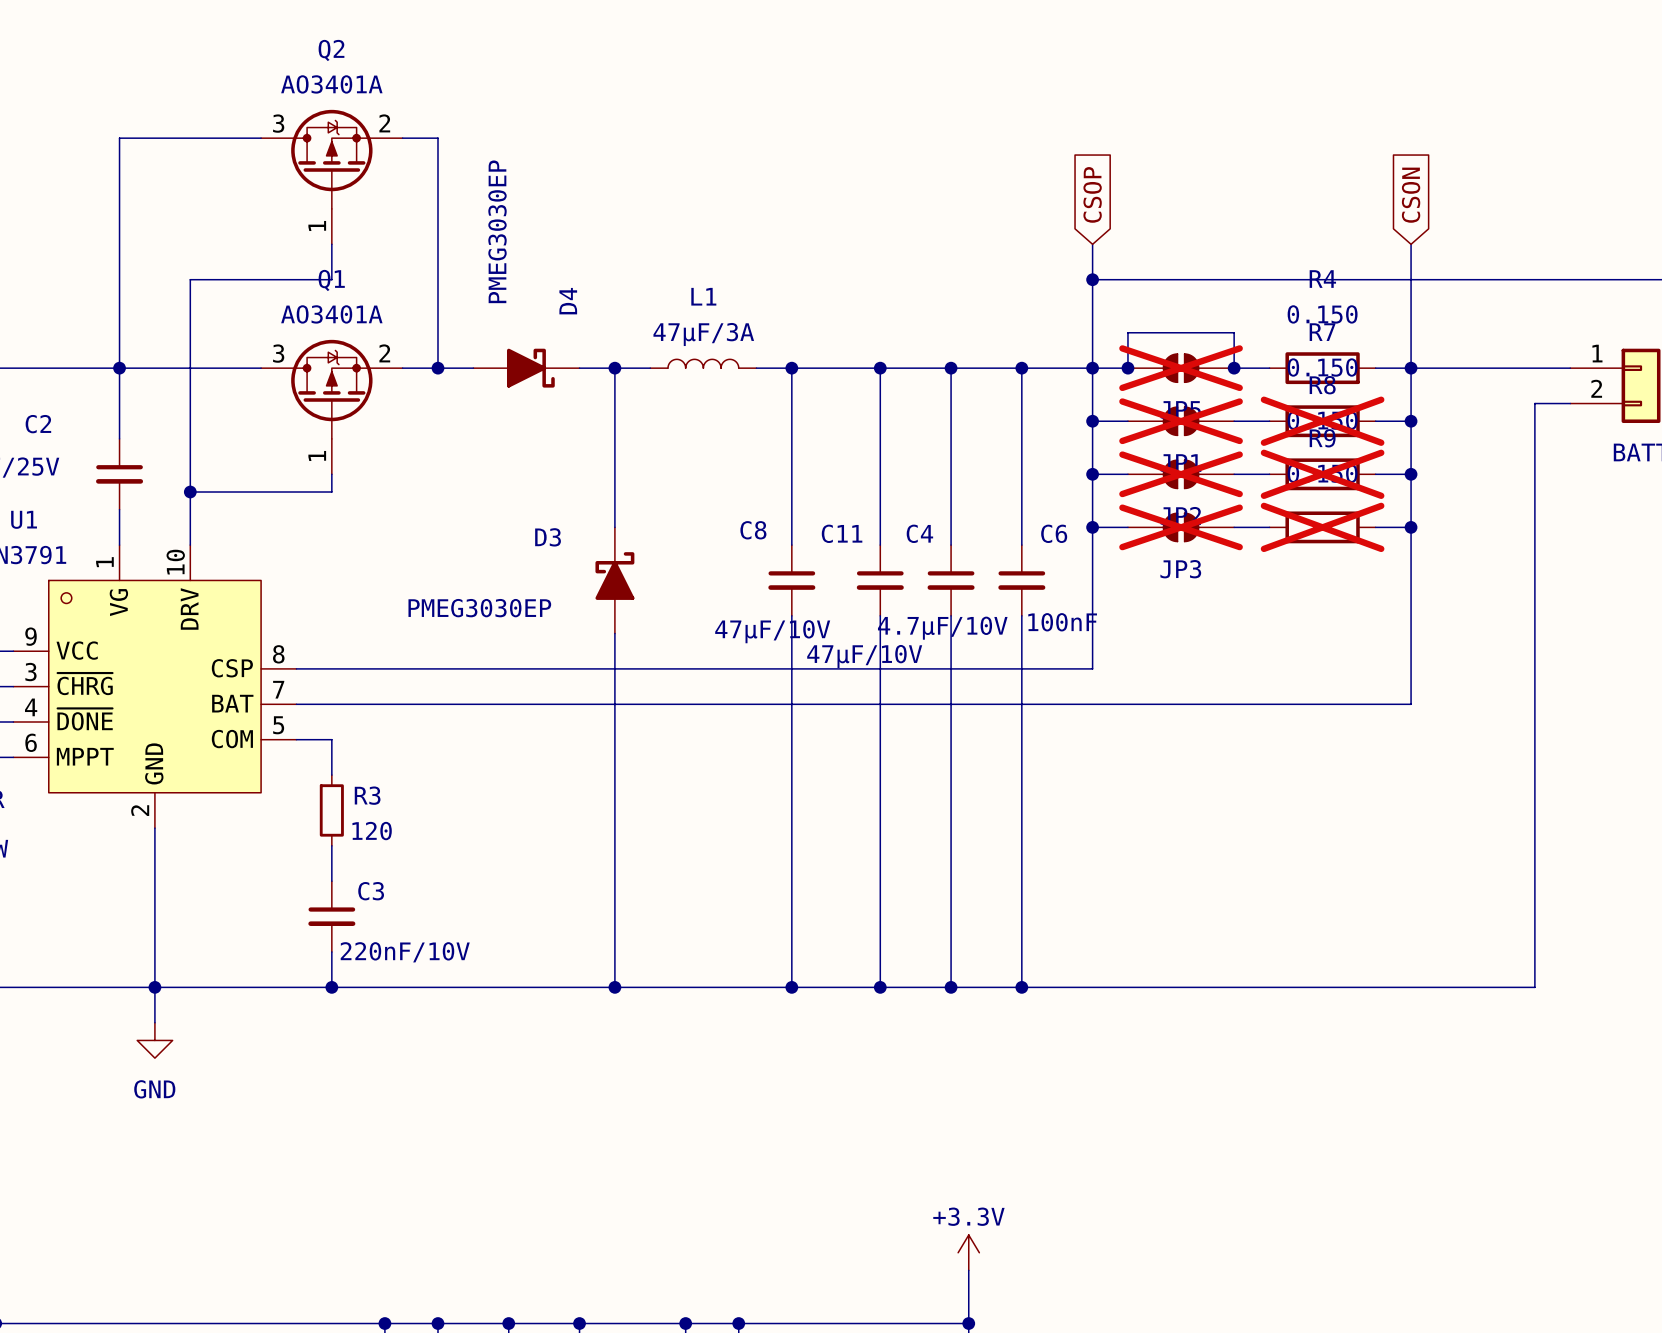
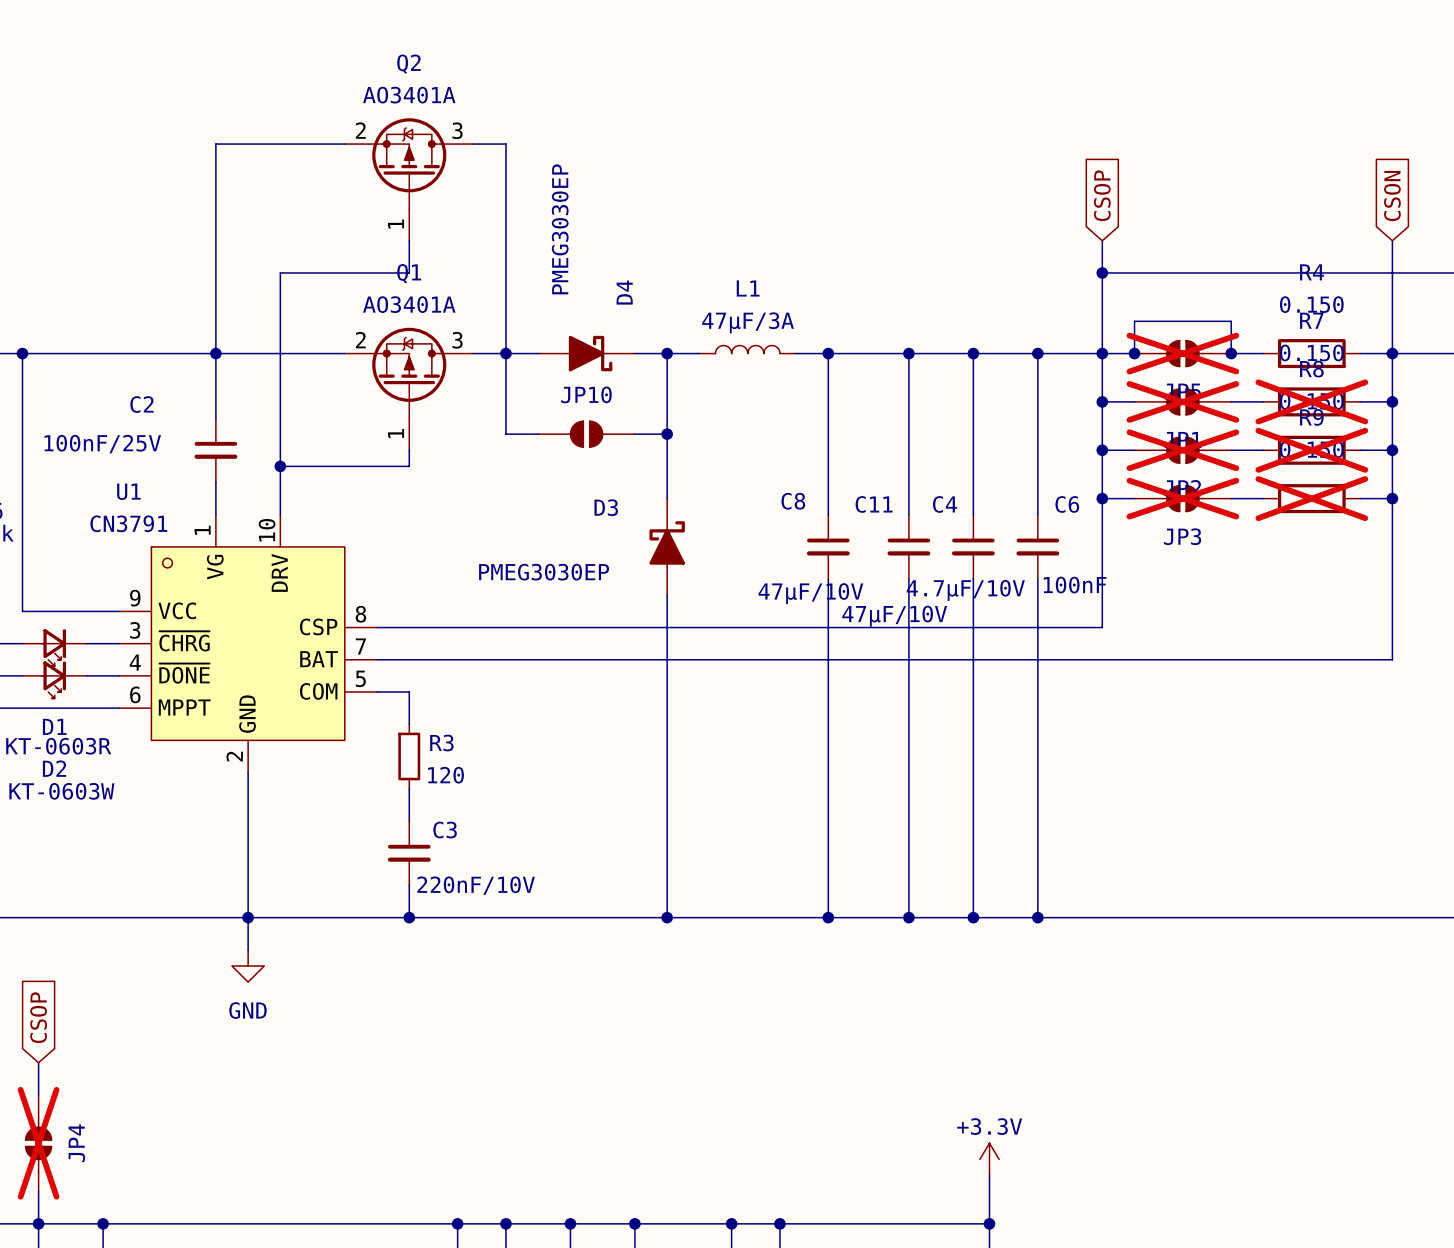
Q2 flip: as is (331, 159) -> left-right (409, 163)
wire: none -> (505, 353) (505, 434) (538, 434)
Q1 flip: as is (331, 389) -> left-right (409, 372)
JP10: none -> (586, 434)
wire: none -> (634, 434) (667, 434)
junction: none -> (667, 434)

